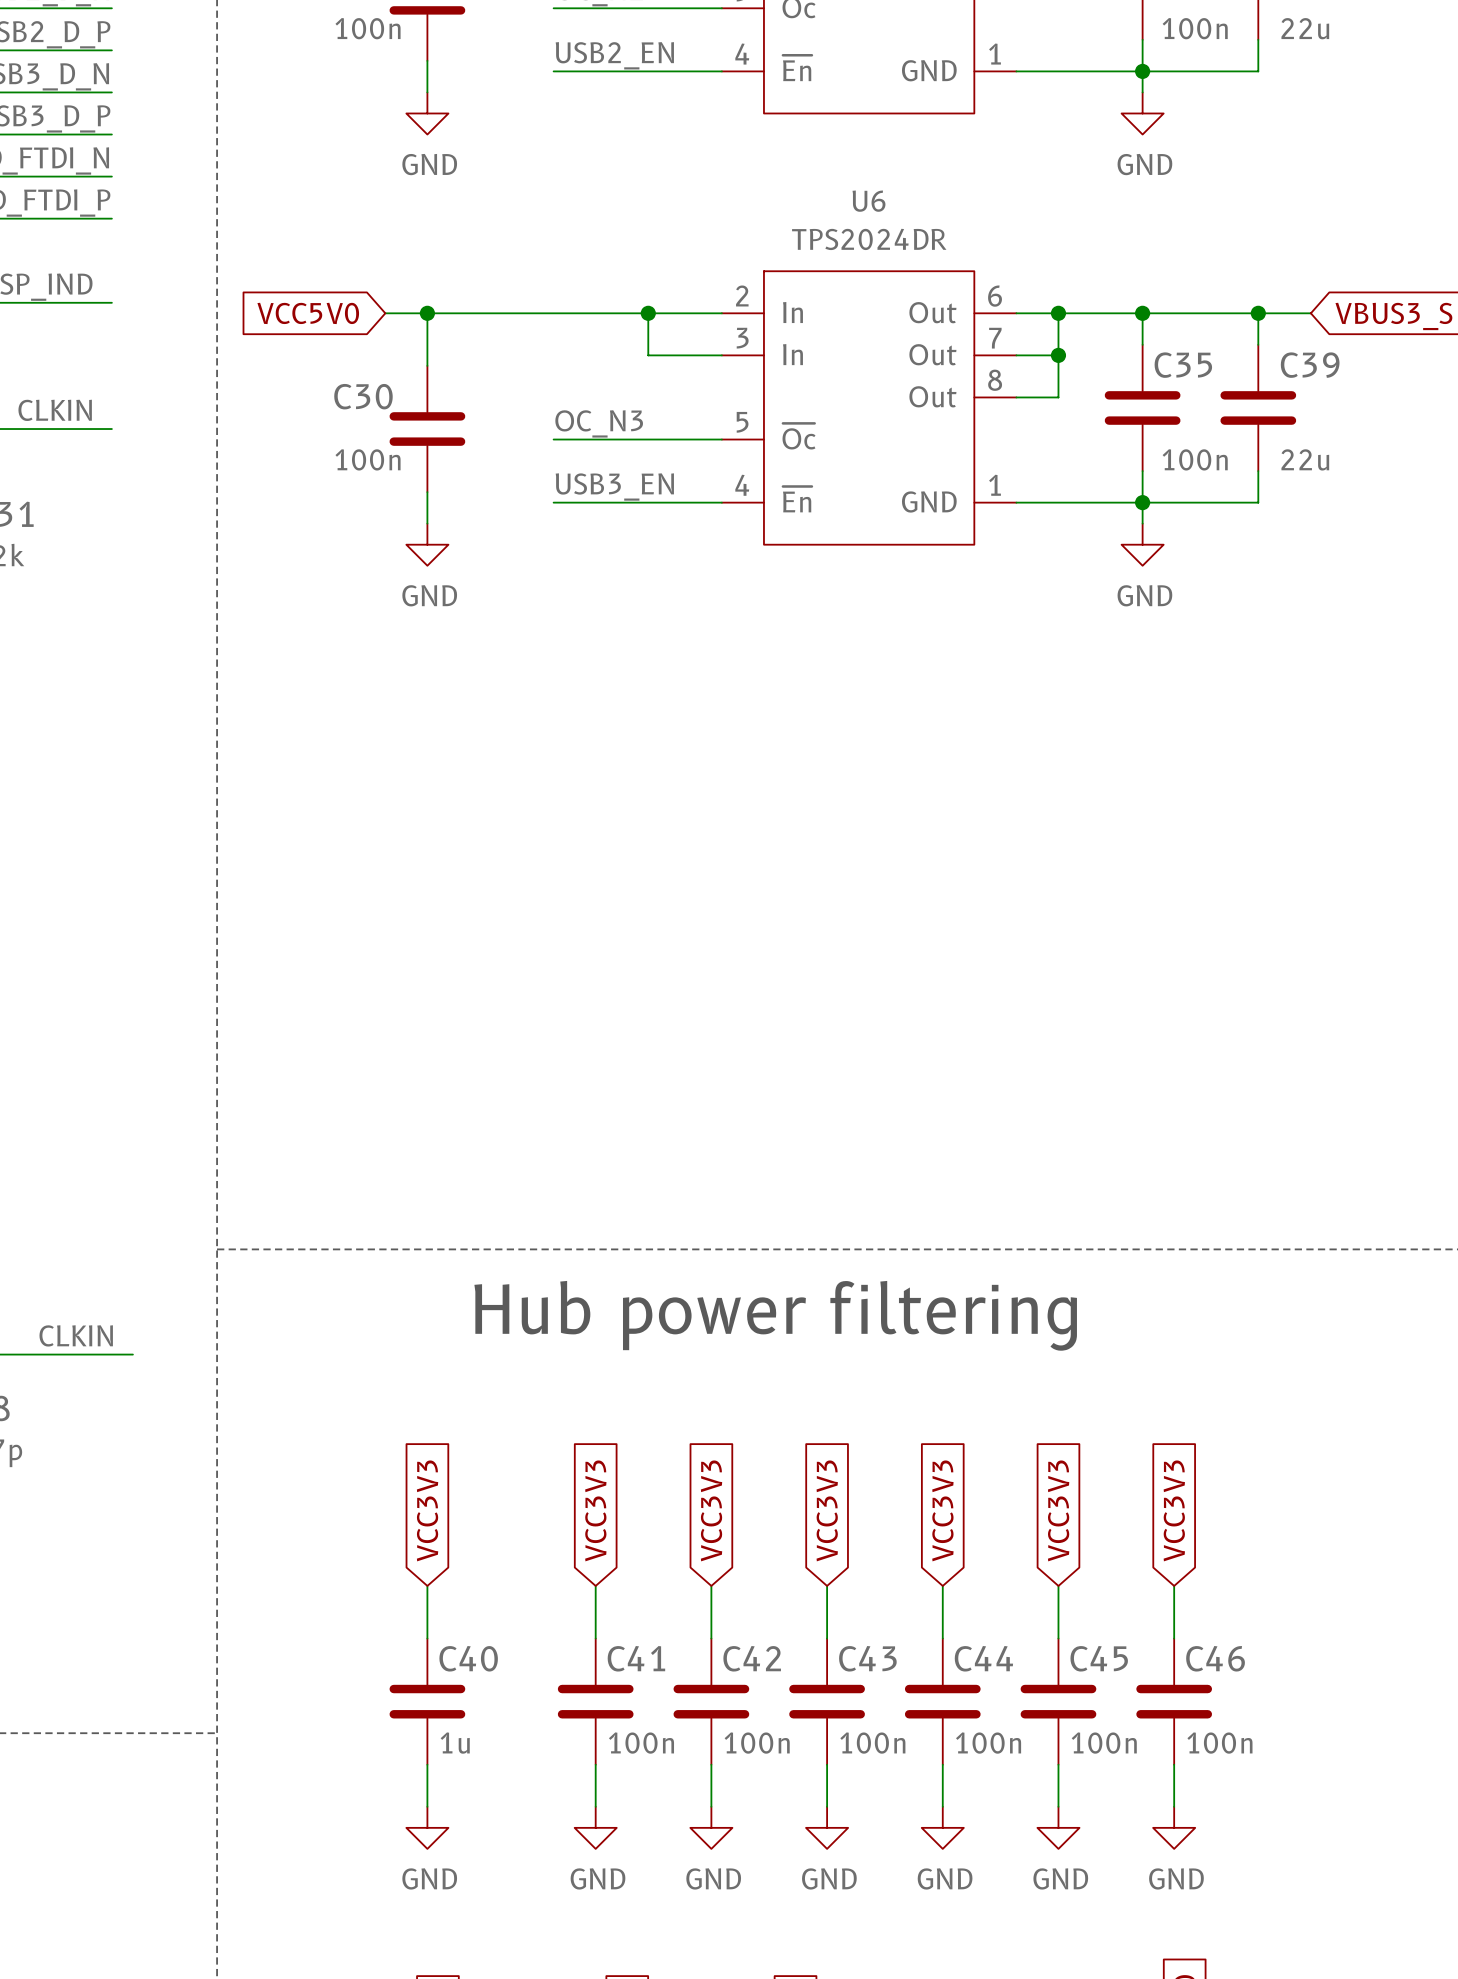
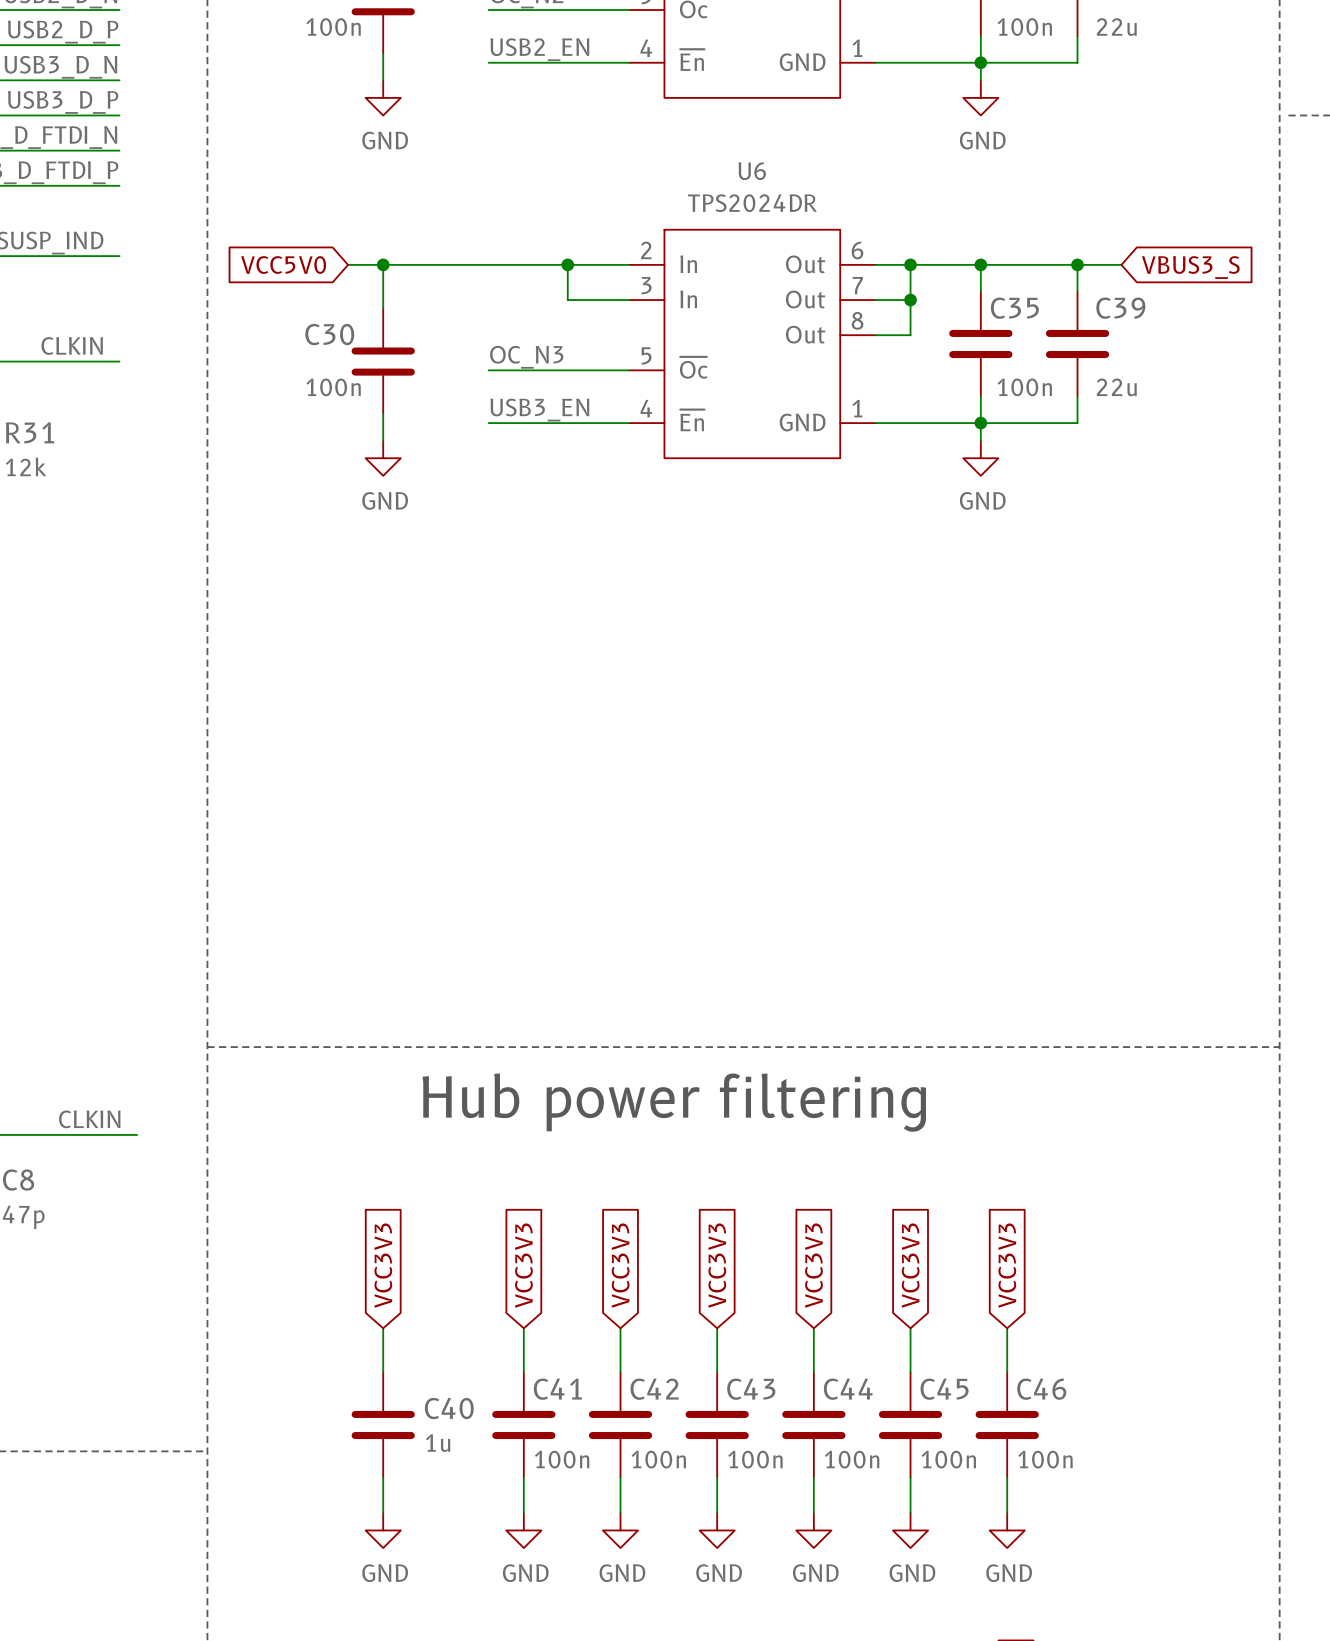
C40 name position: C40 (468, 1658) -> C40 (449, 1408)
C40 text position: 1u (455, 1743) -> 1u (438, 1443)

